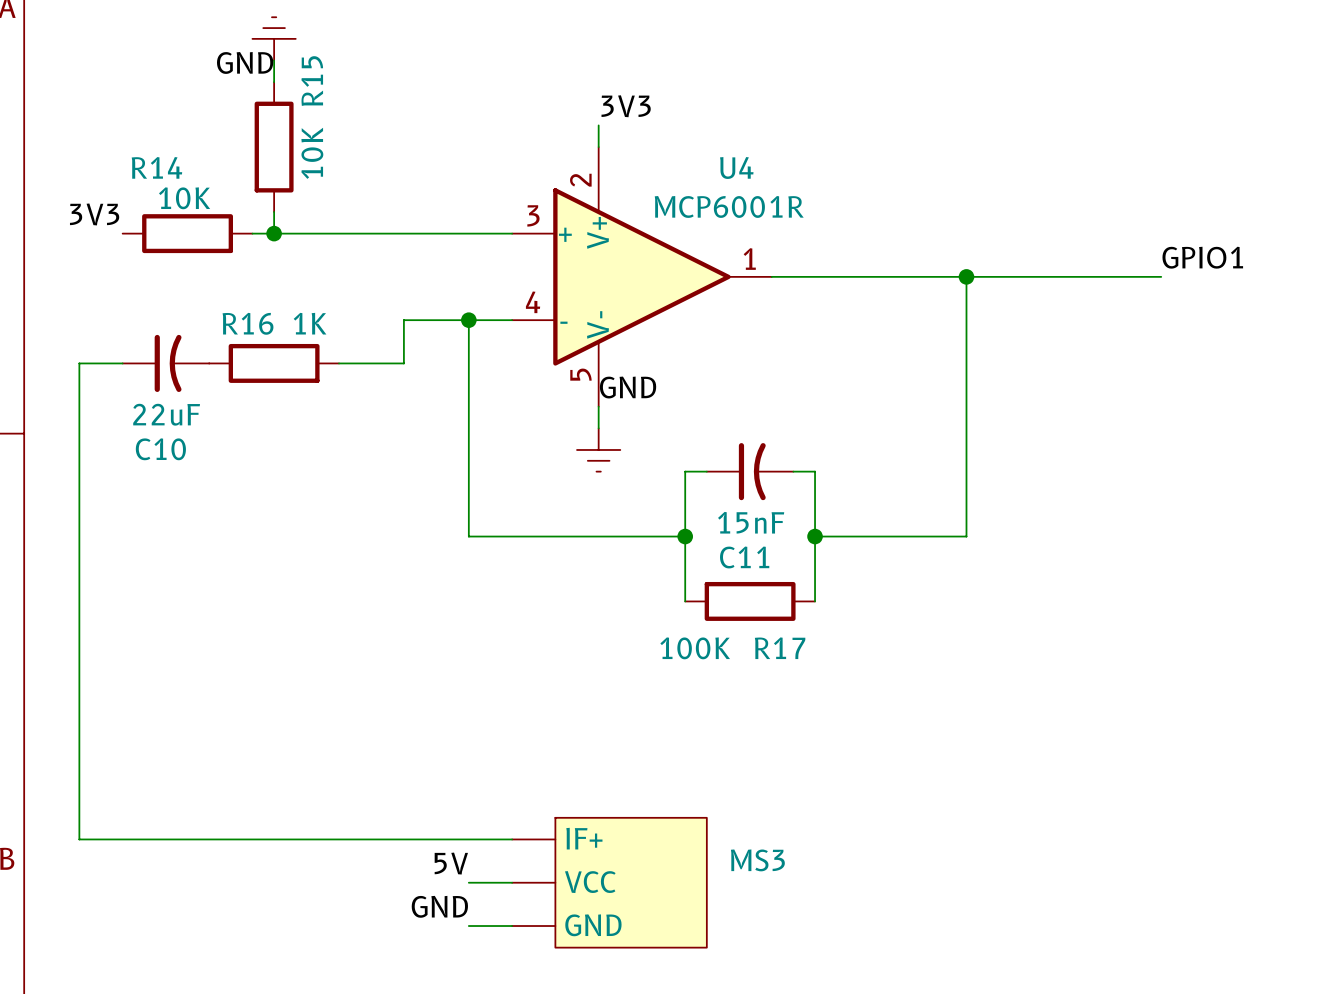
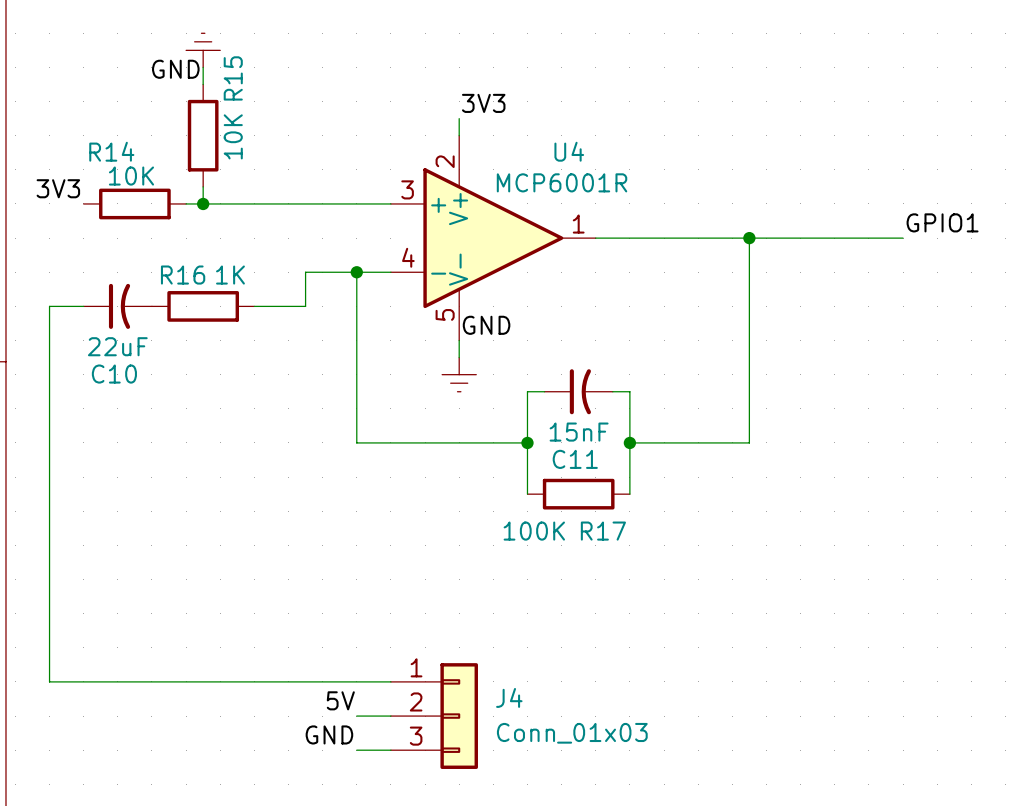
J4: none -> Conn_01x03 (434, 716)
MS3: (609, 882) -> none

